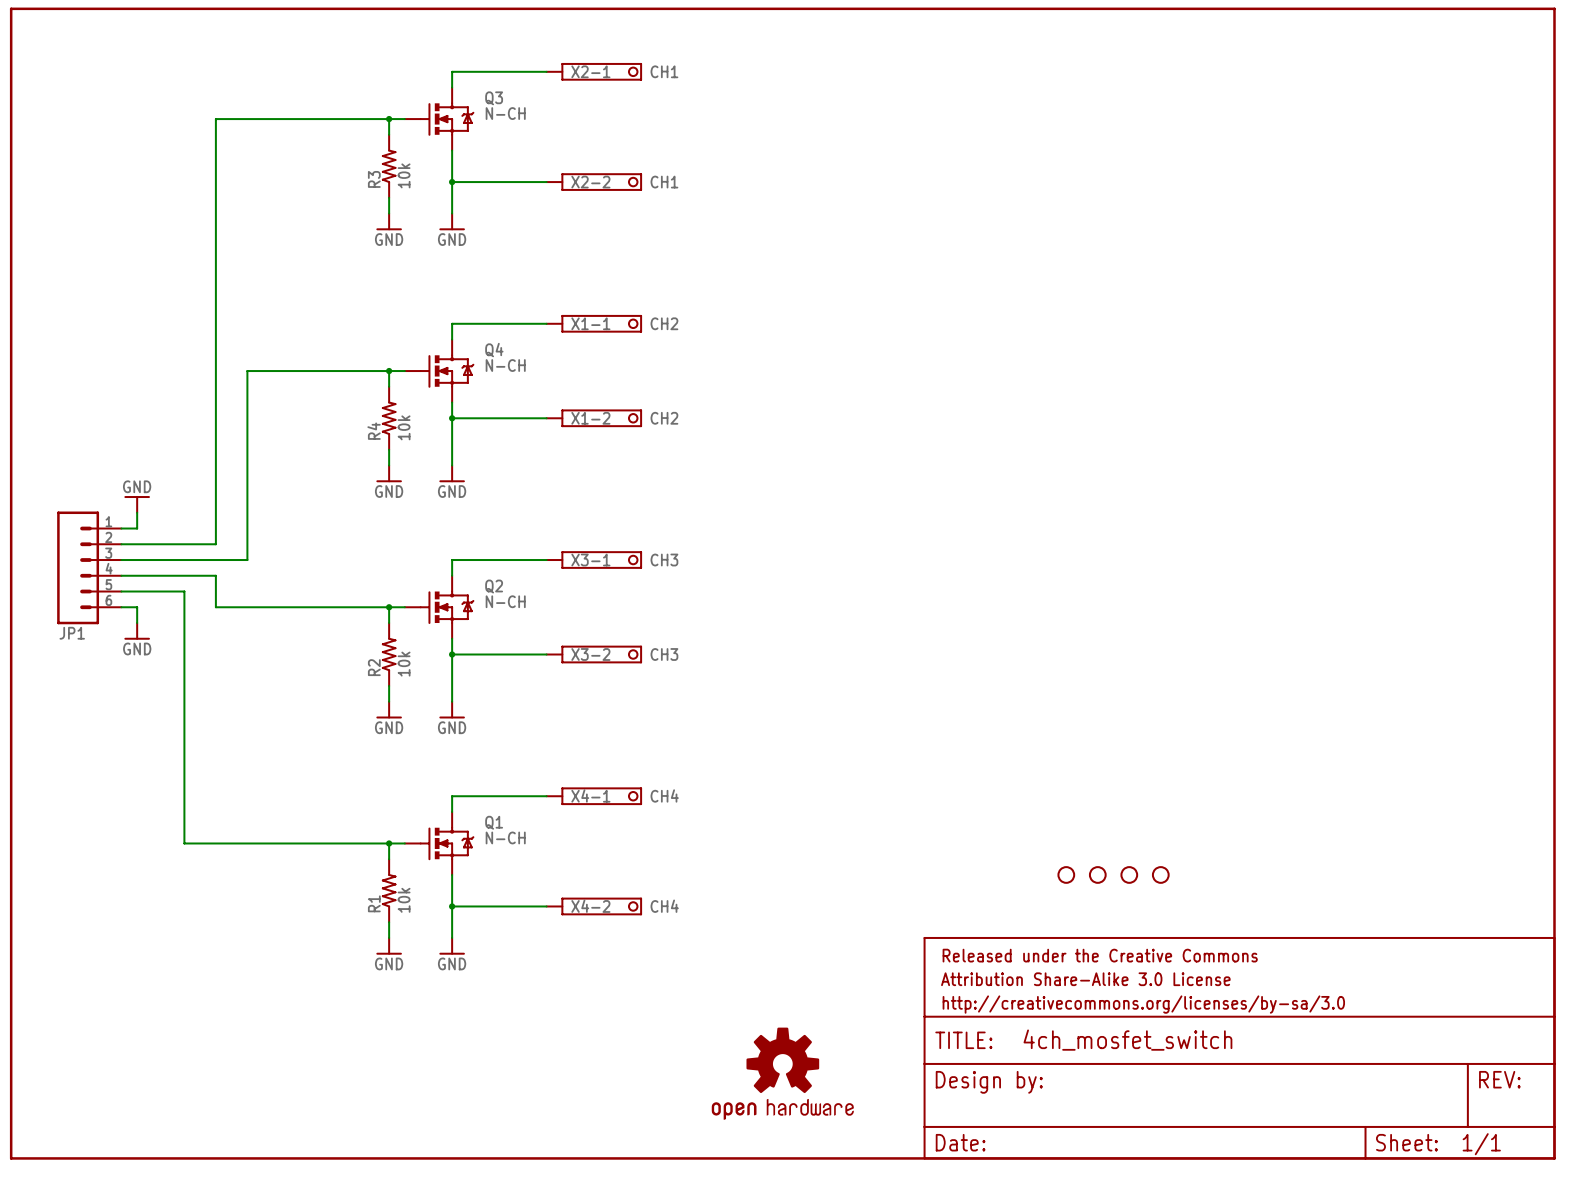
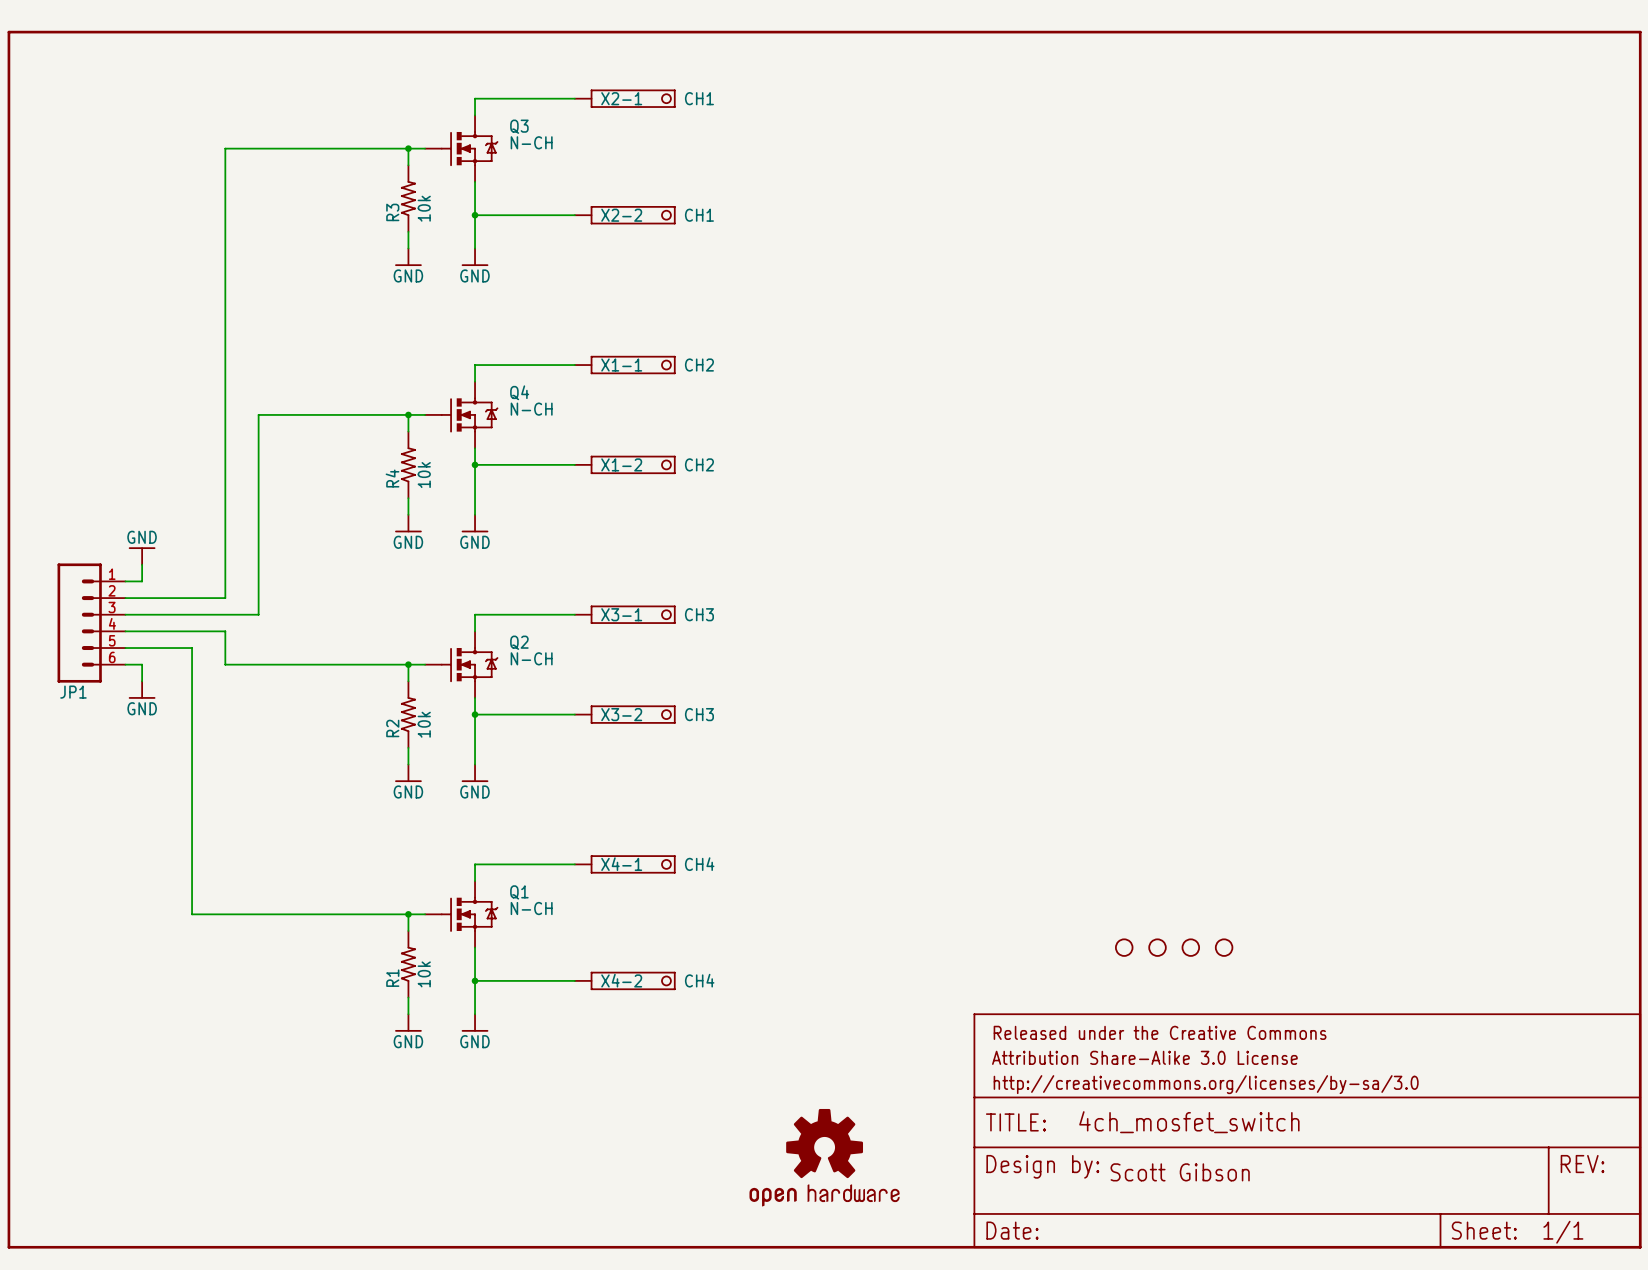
text: none -> Scott Gibson (1180, 1172)

